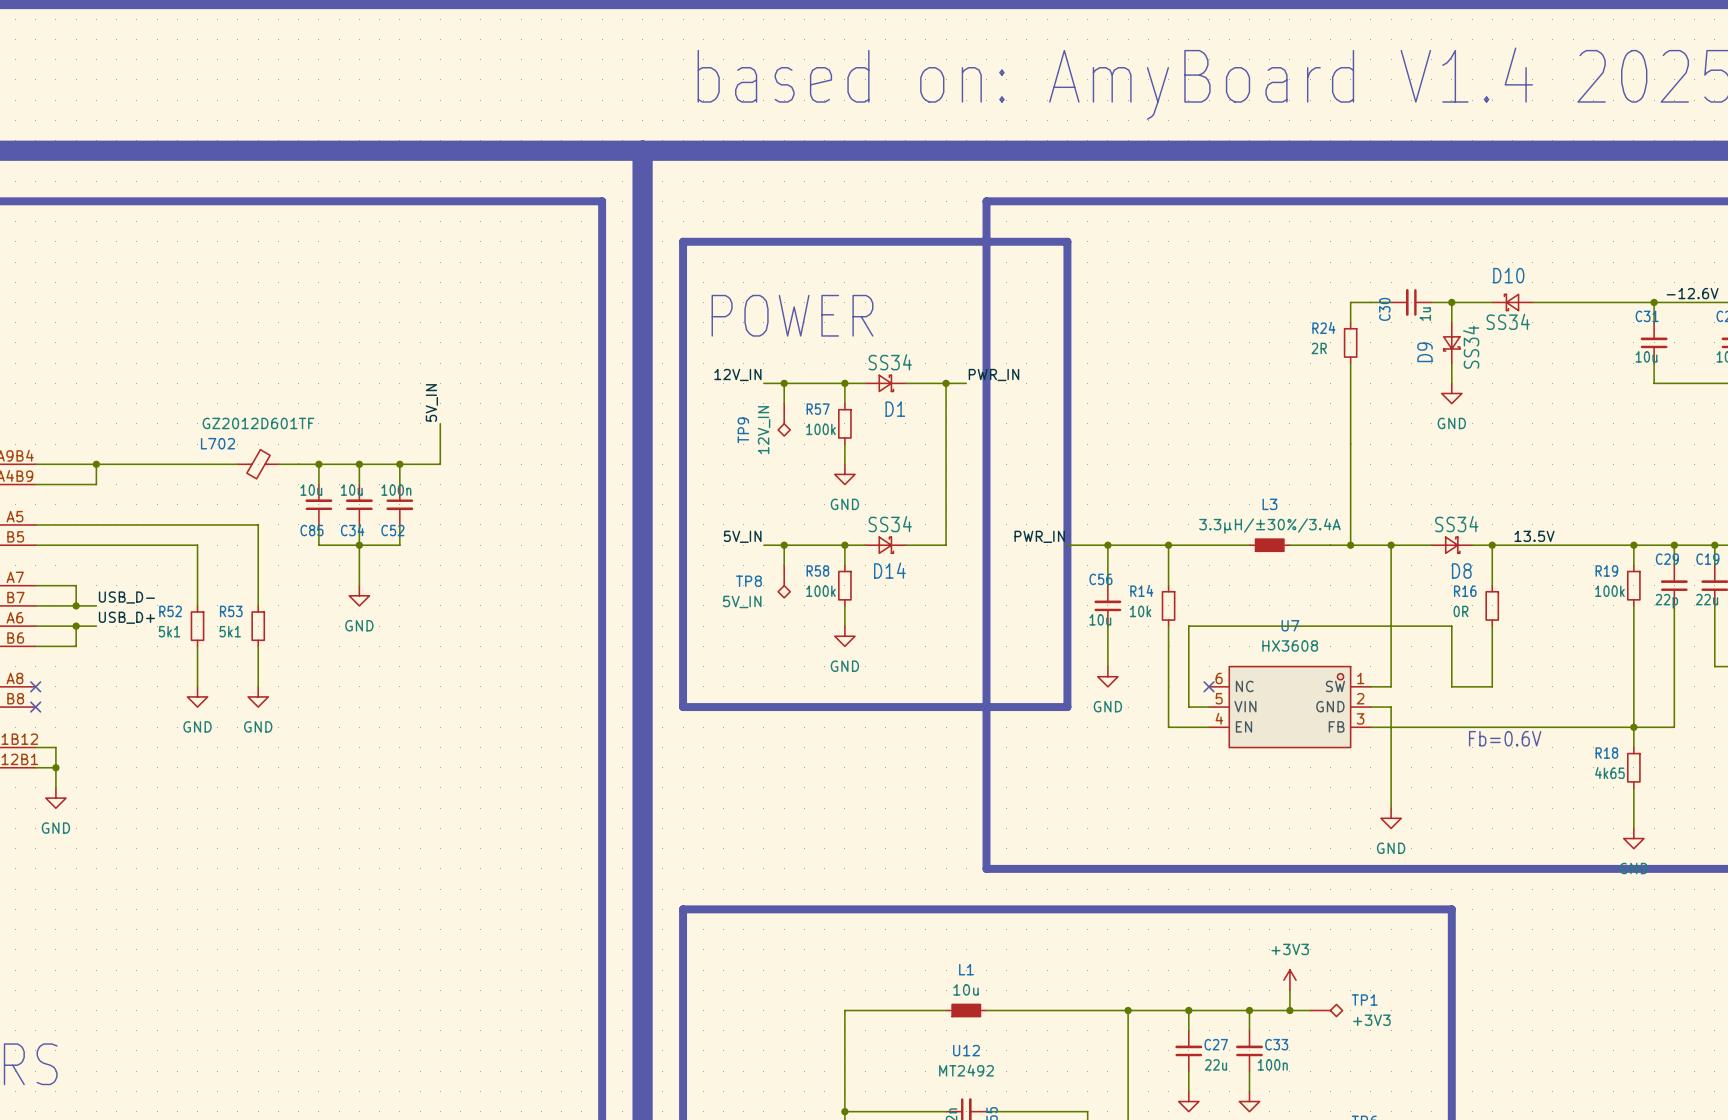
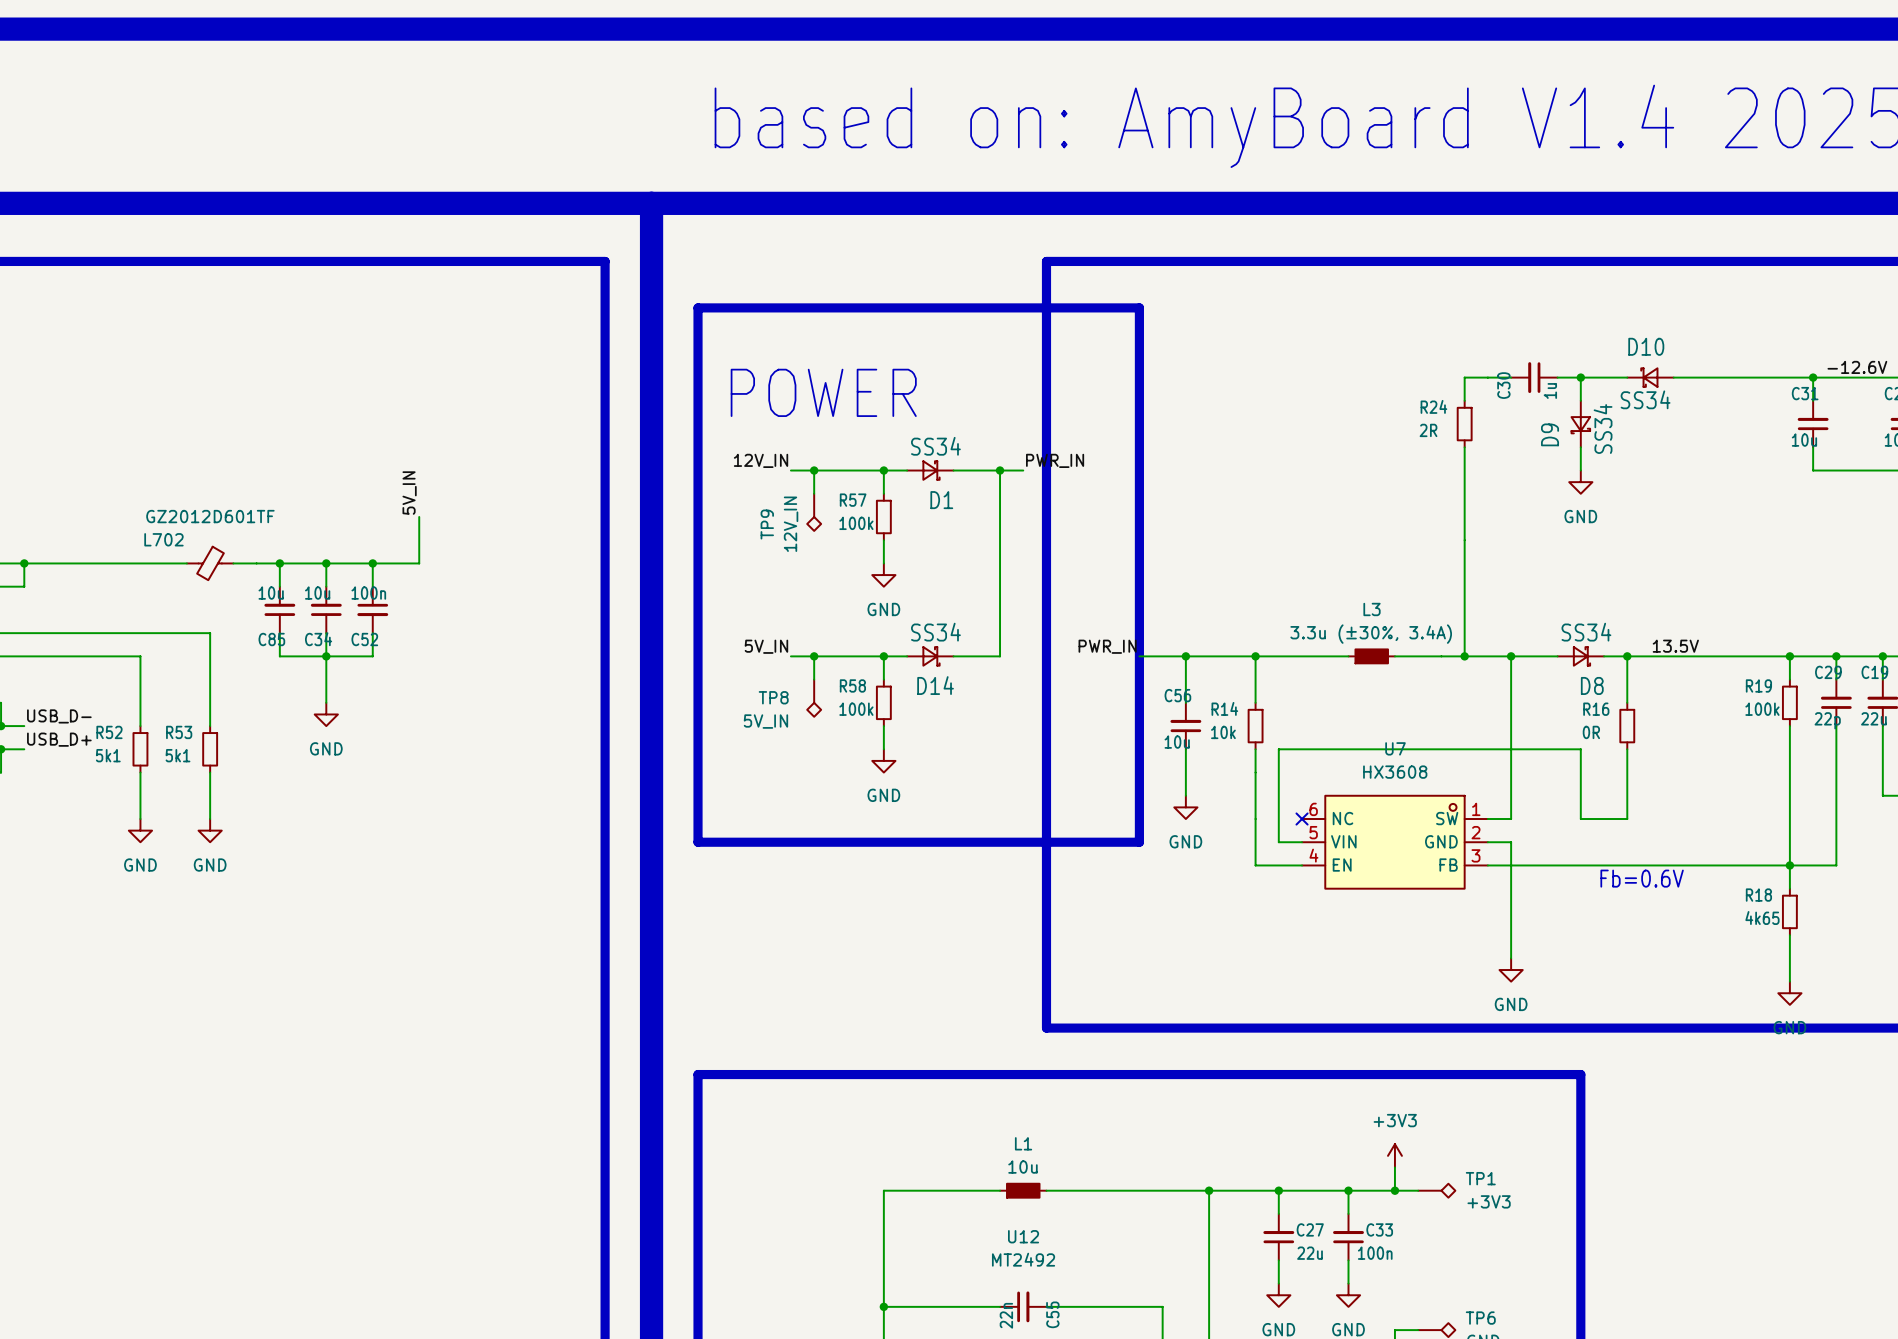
L3 value: 3.3µH/±30%/3.4A (1269, 526) -> 3.3u (±30%, 3.4A) (1371, 634)

